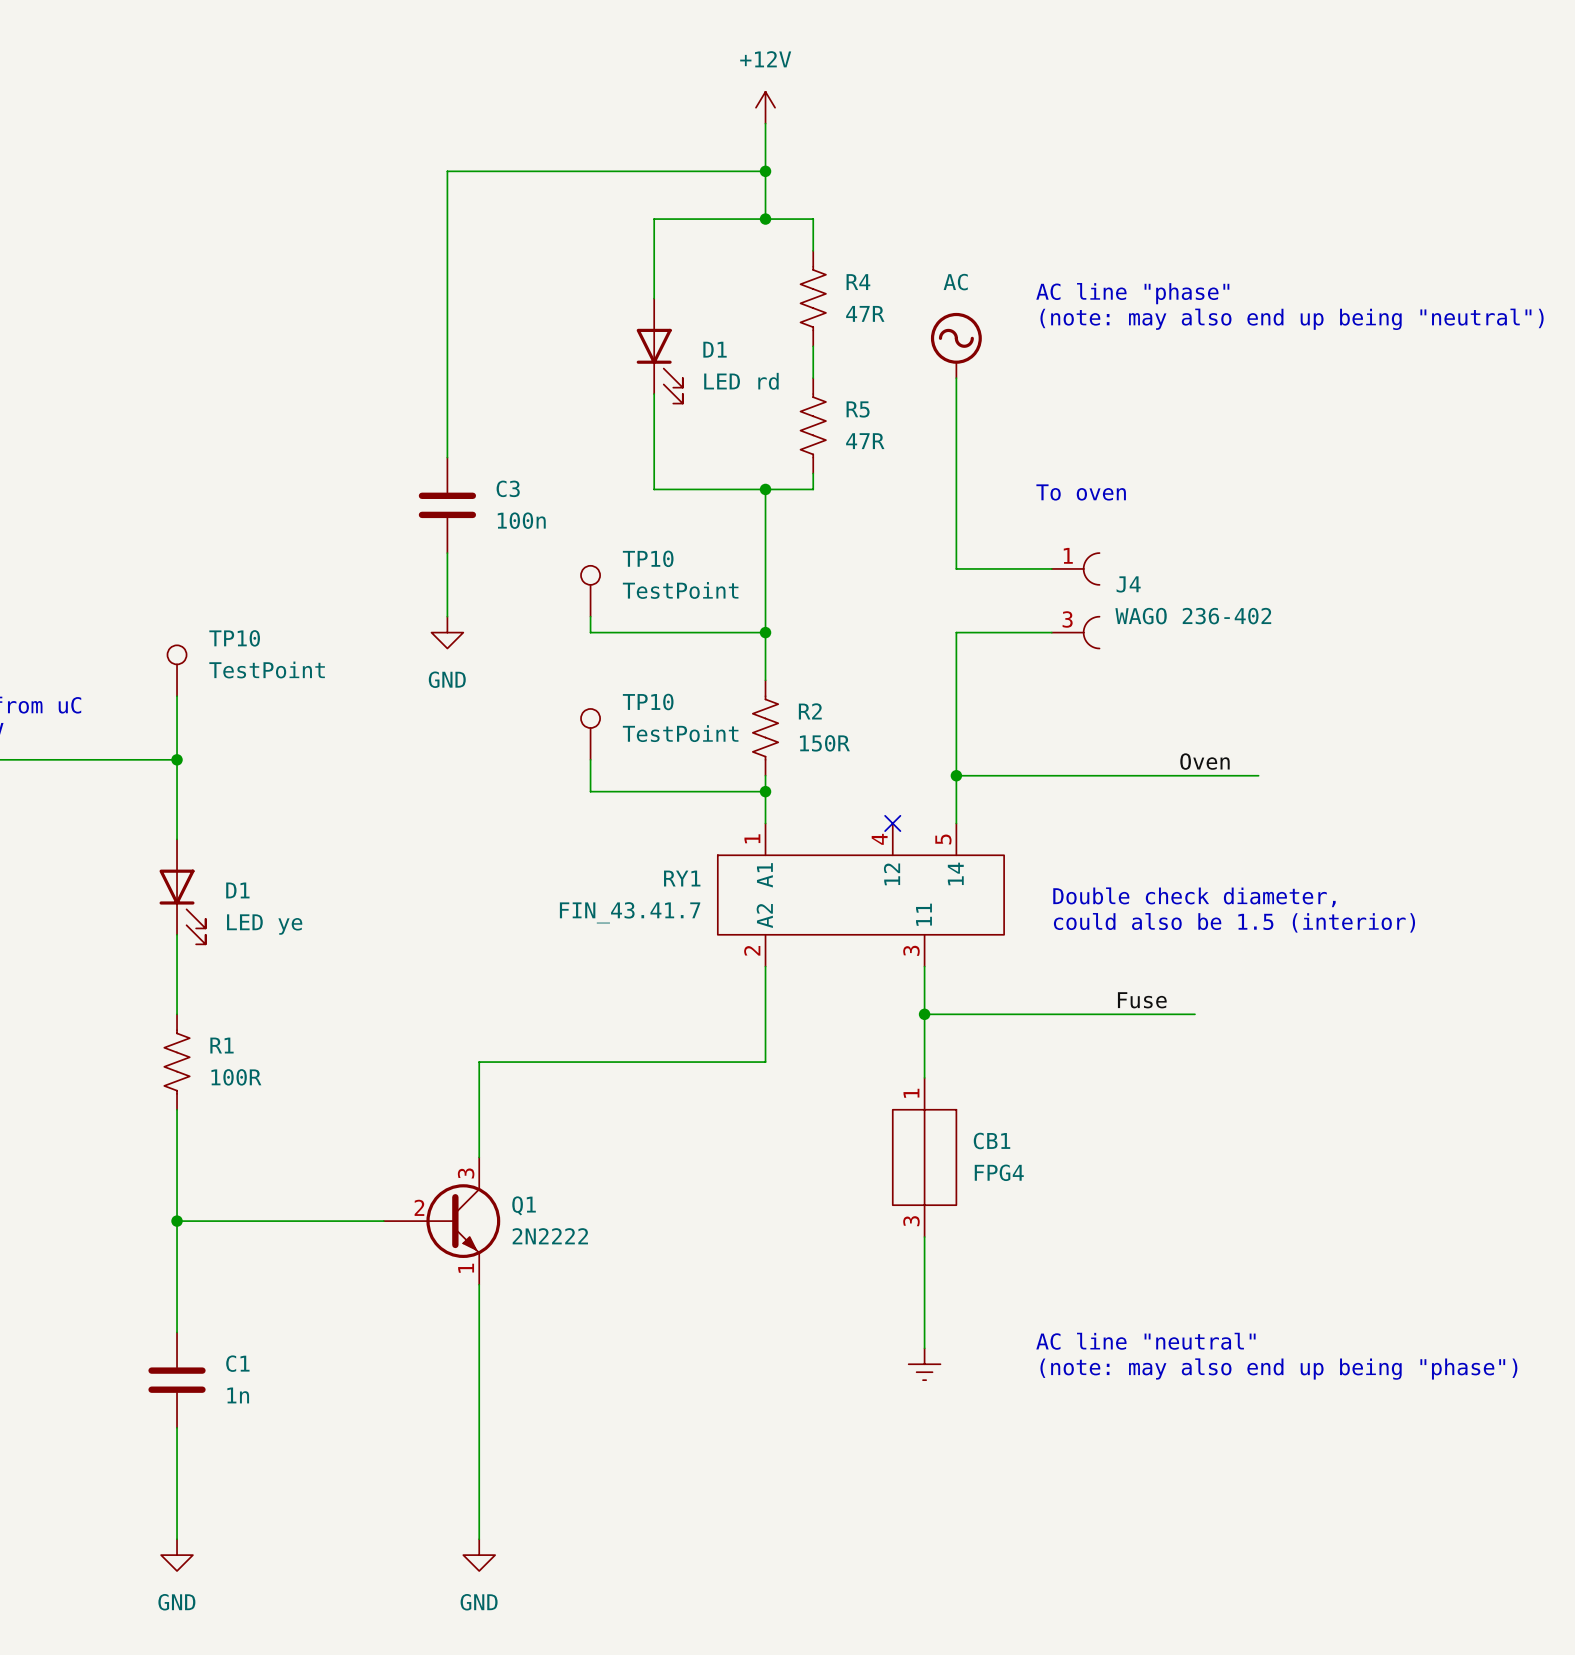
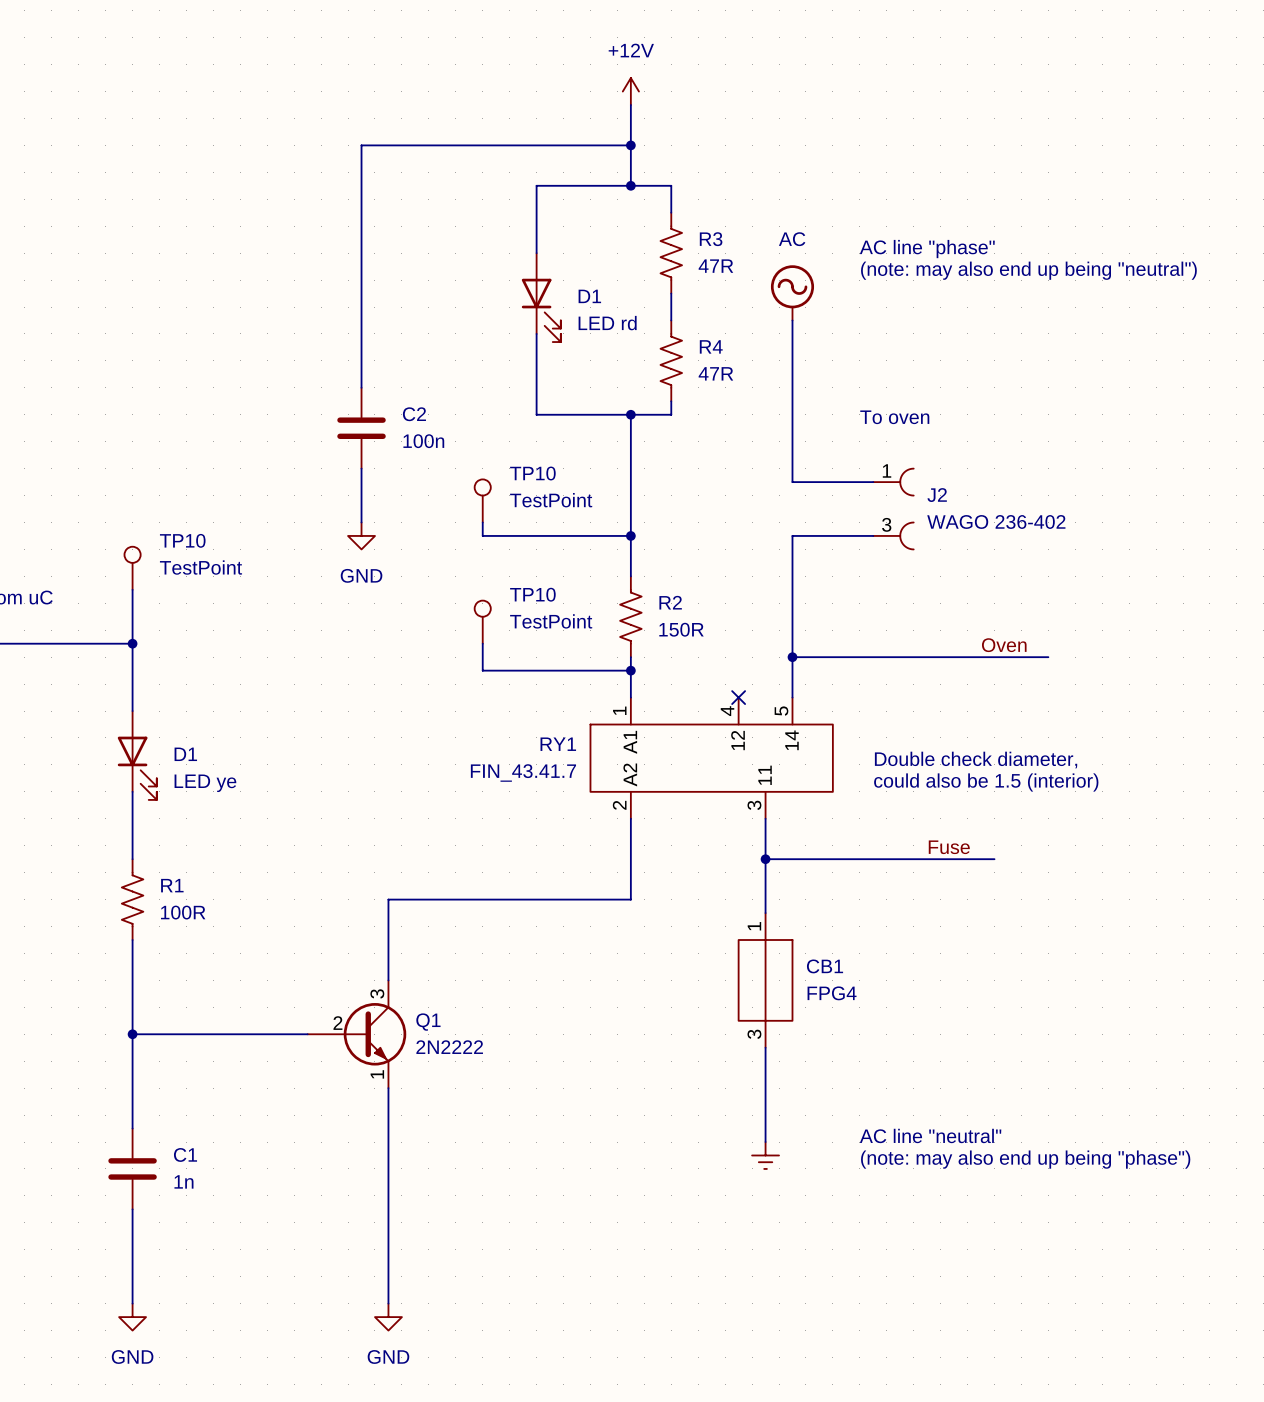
R4 name: R4 (858, 282) -> R3 (711, 239)
R5 name: R5 (858, 409) -> R4 (711, 346)
C3 name: C3 (508, 488) -> C2 (414, 414)
J4 name: J4 (1128, 584) -> J2 (937, 495)

